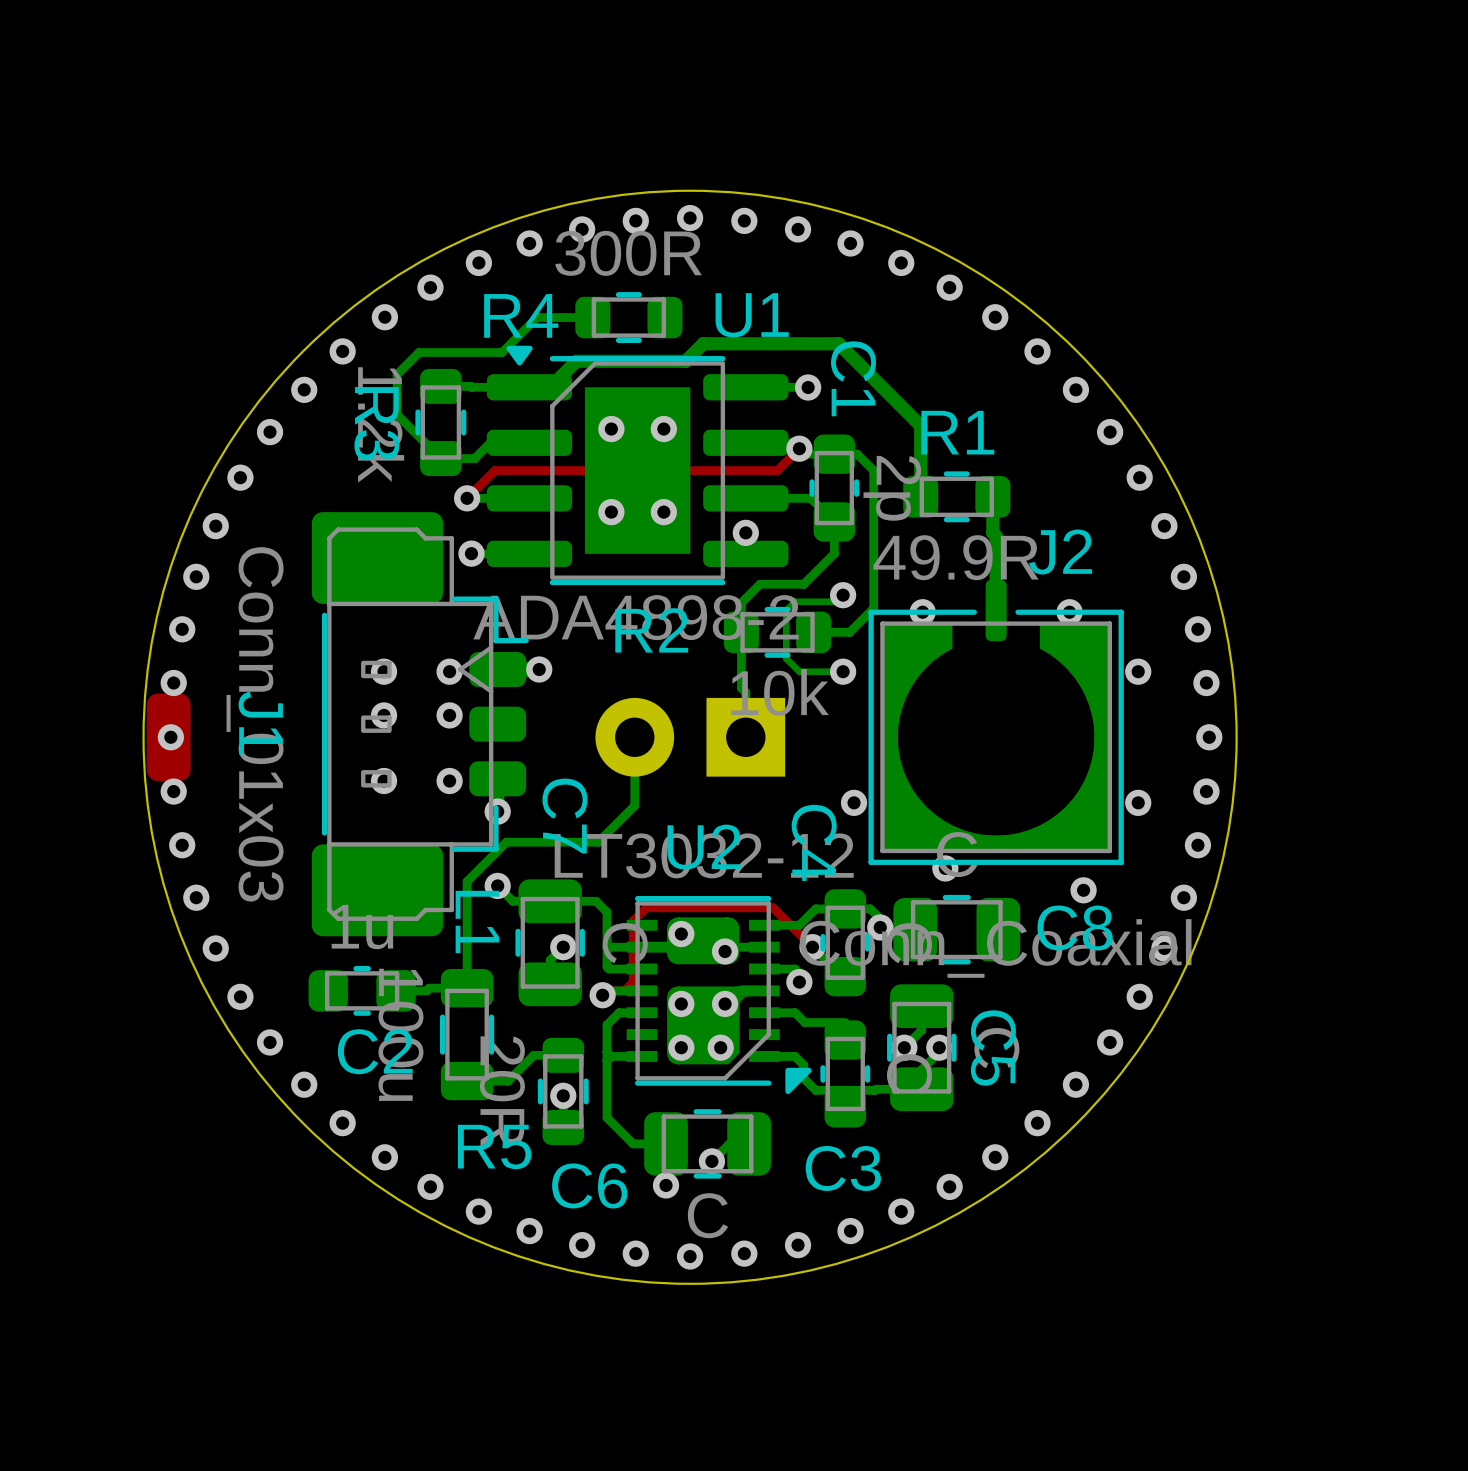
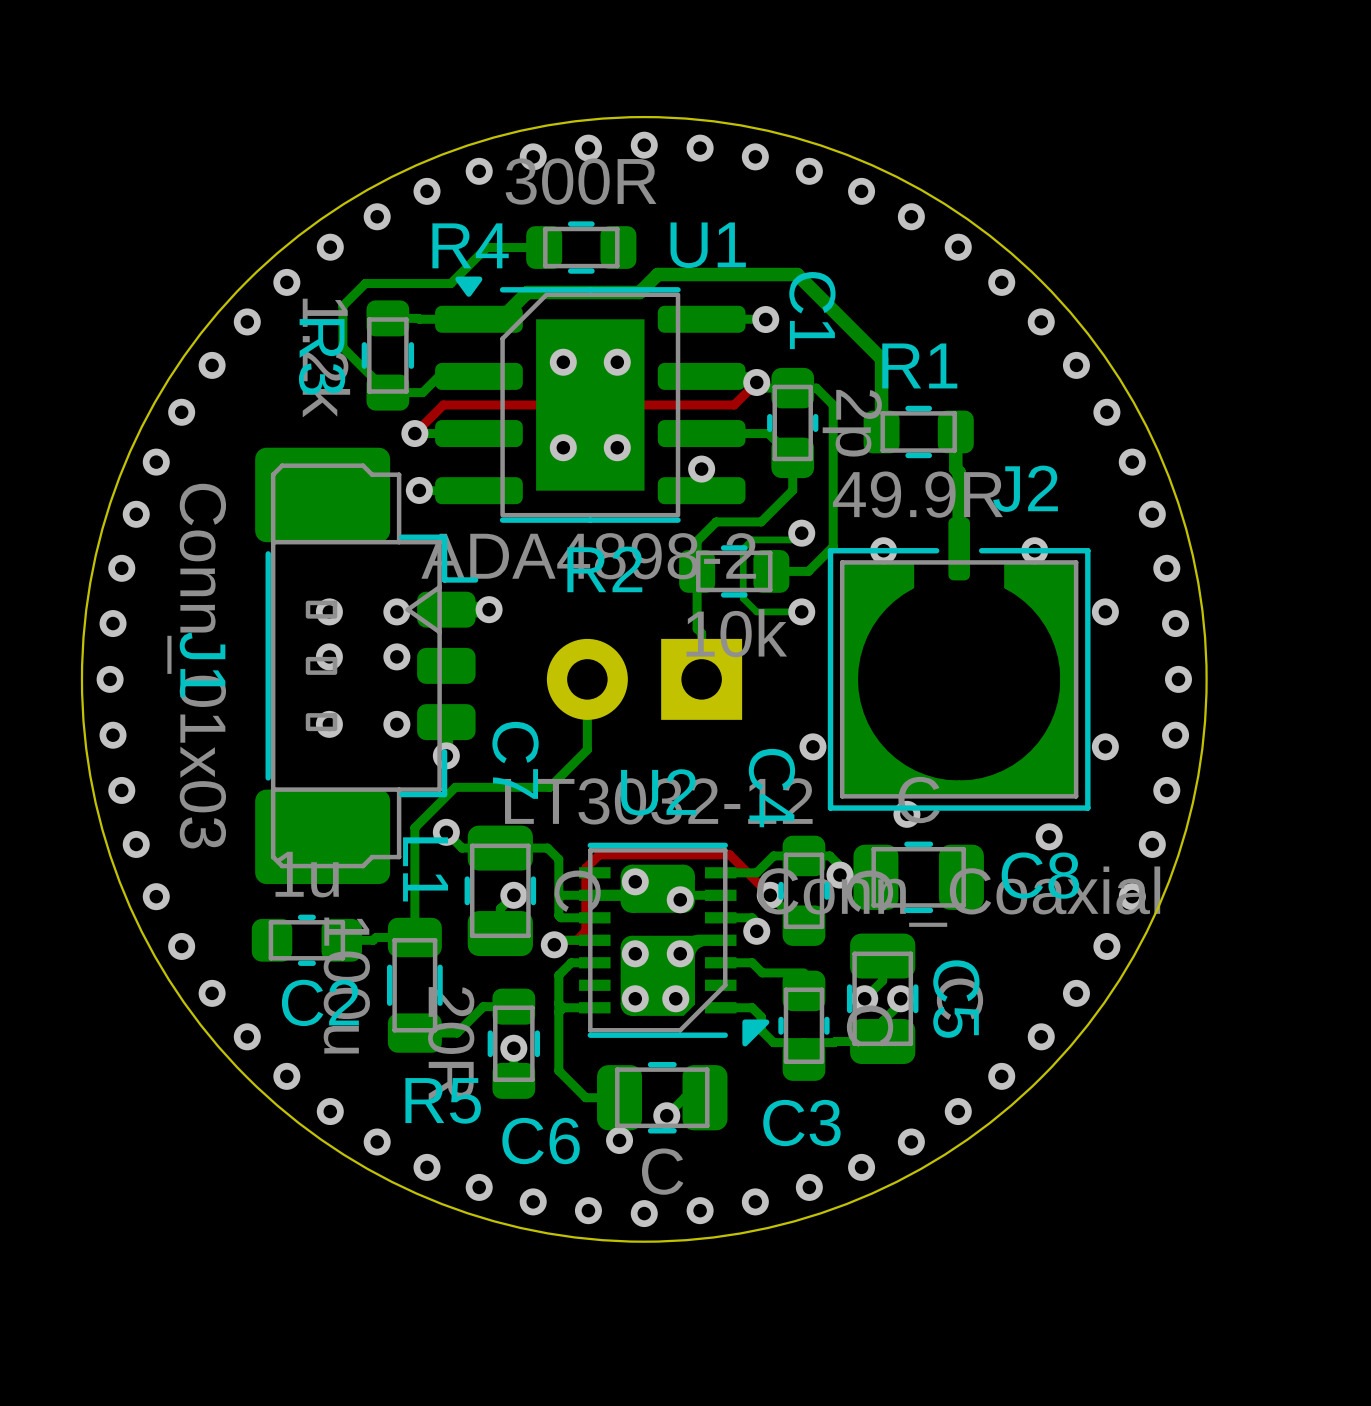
part: (168, 737) -> none

